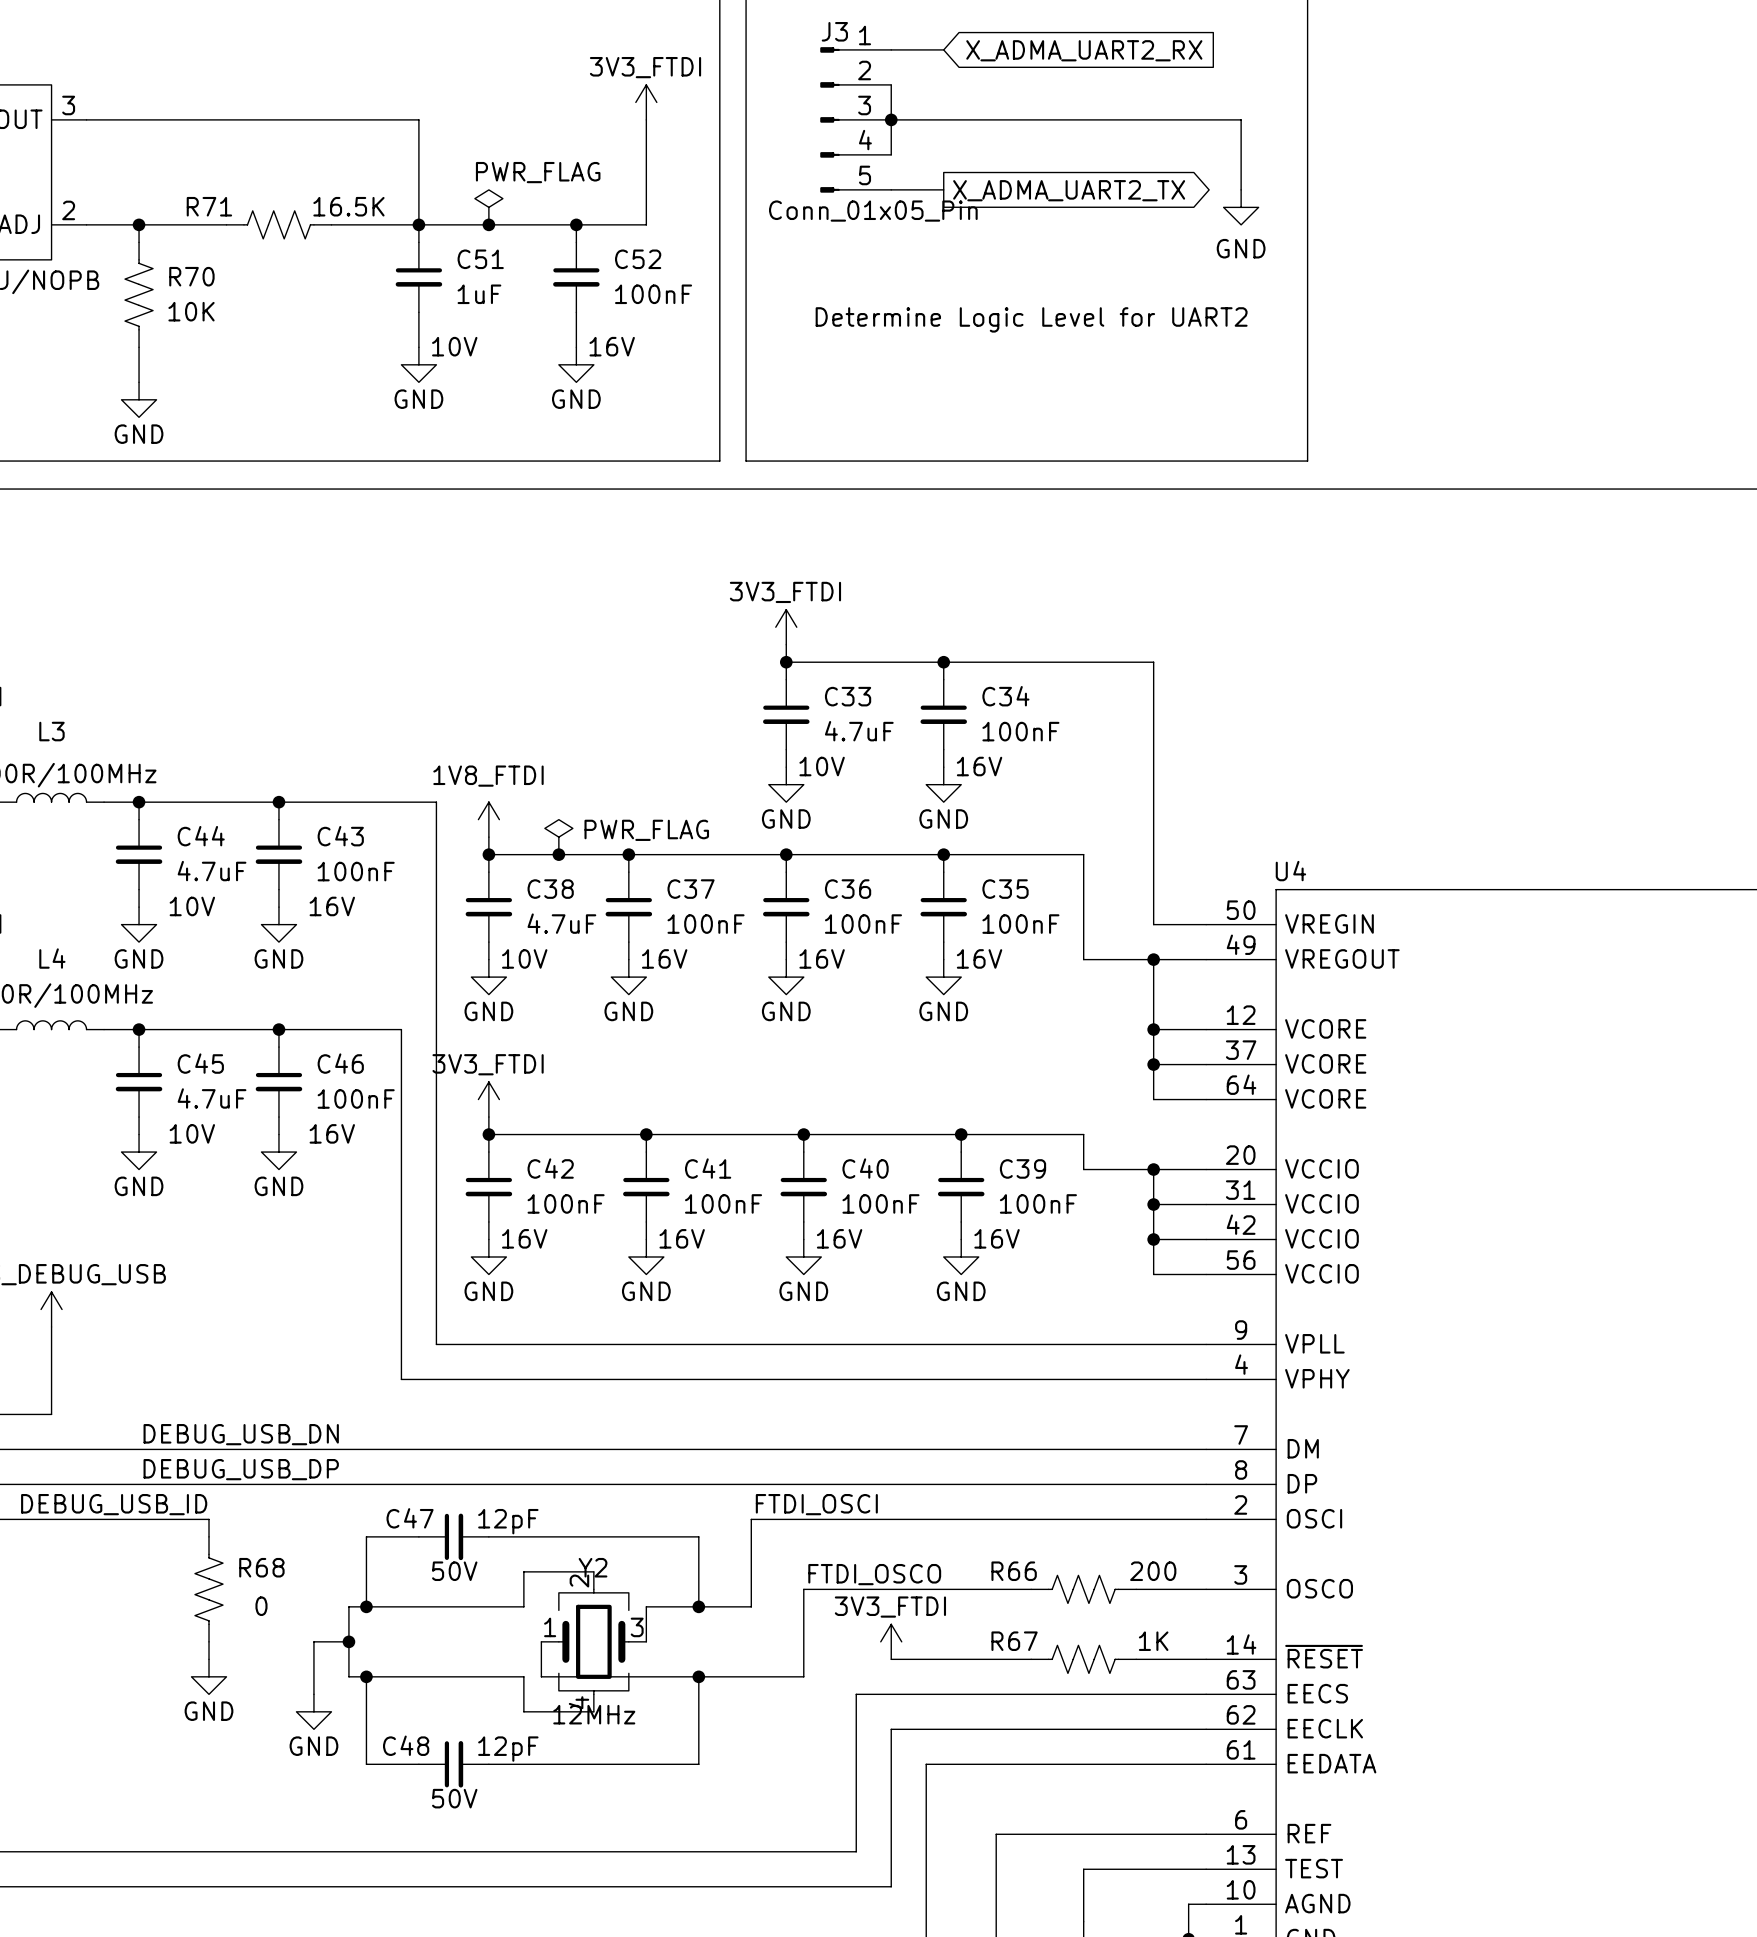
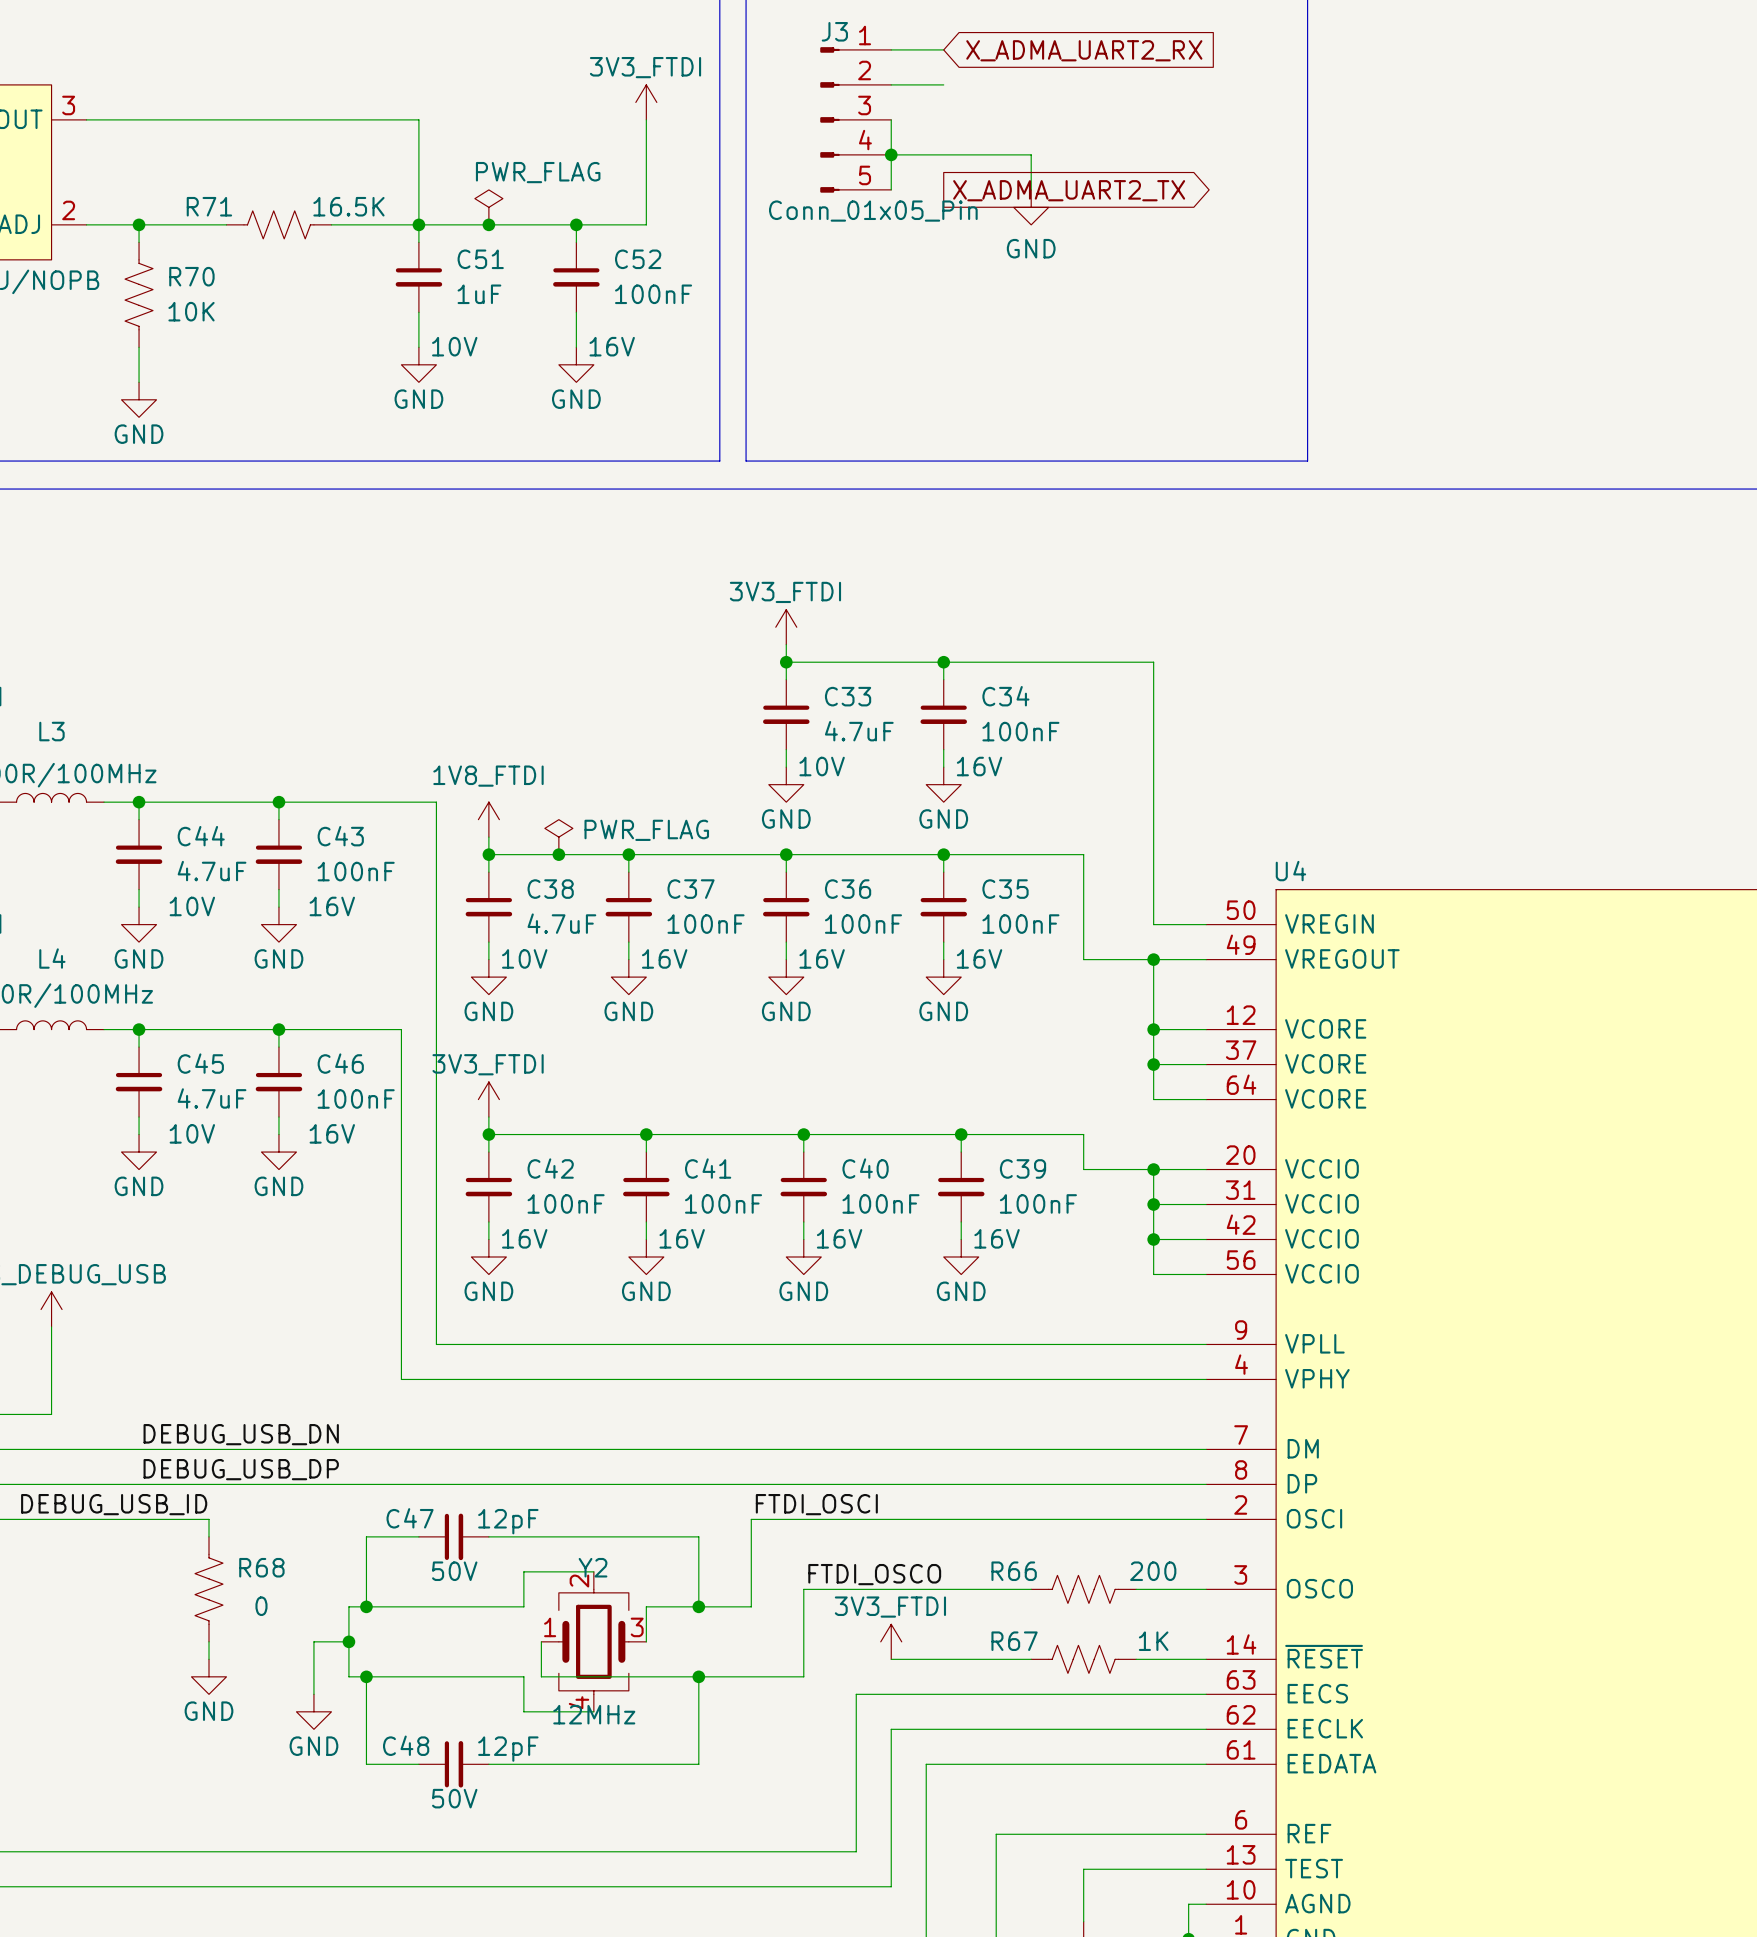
wire: (891, 84) (891, 119) (1241, 119) (1241, 189) -> (891, 84) (943, 84)
junction position: (891, 119) -> (891, 154)
wire: (891, 189) (943, 189) -> (891, 189) (891, 154) (1031, 154) (1031, 189)
power symbol position: GND (1241, 207) -> GND (1031, 207)
text: Determine Logic Level for UART2 (1031, 319) -> none

